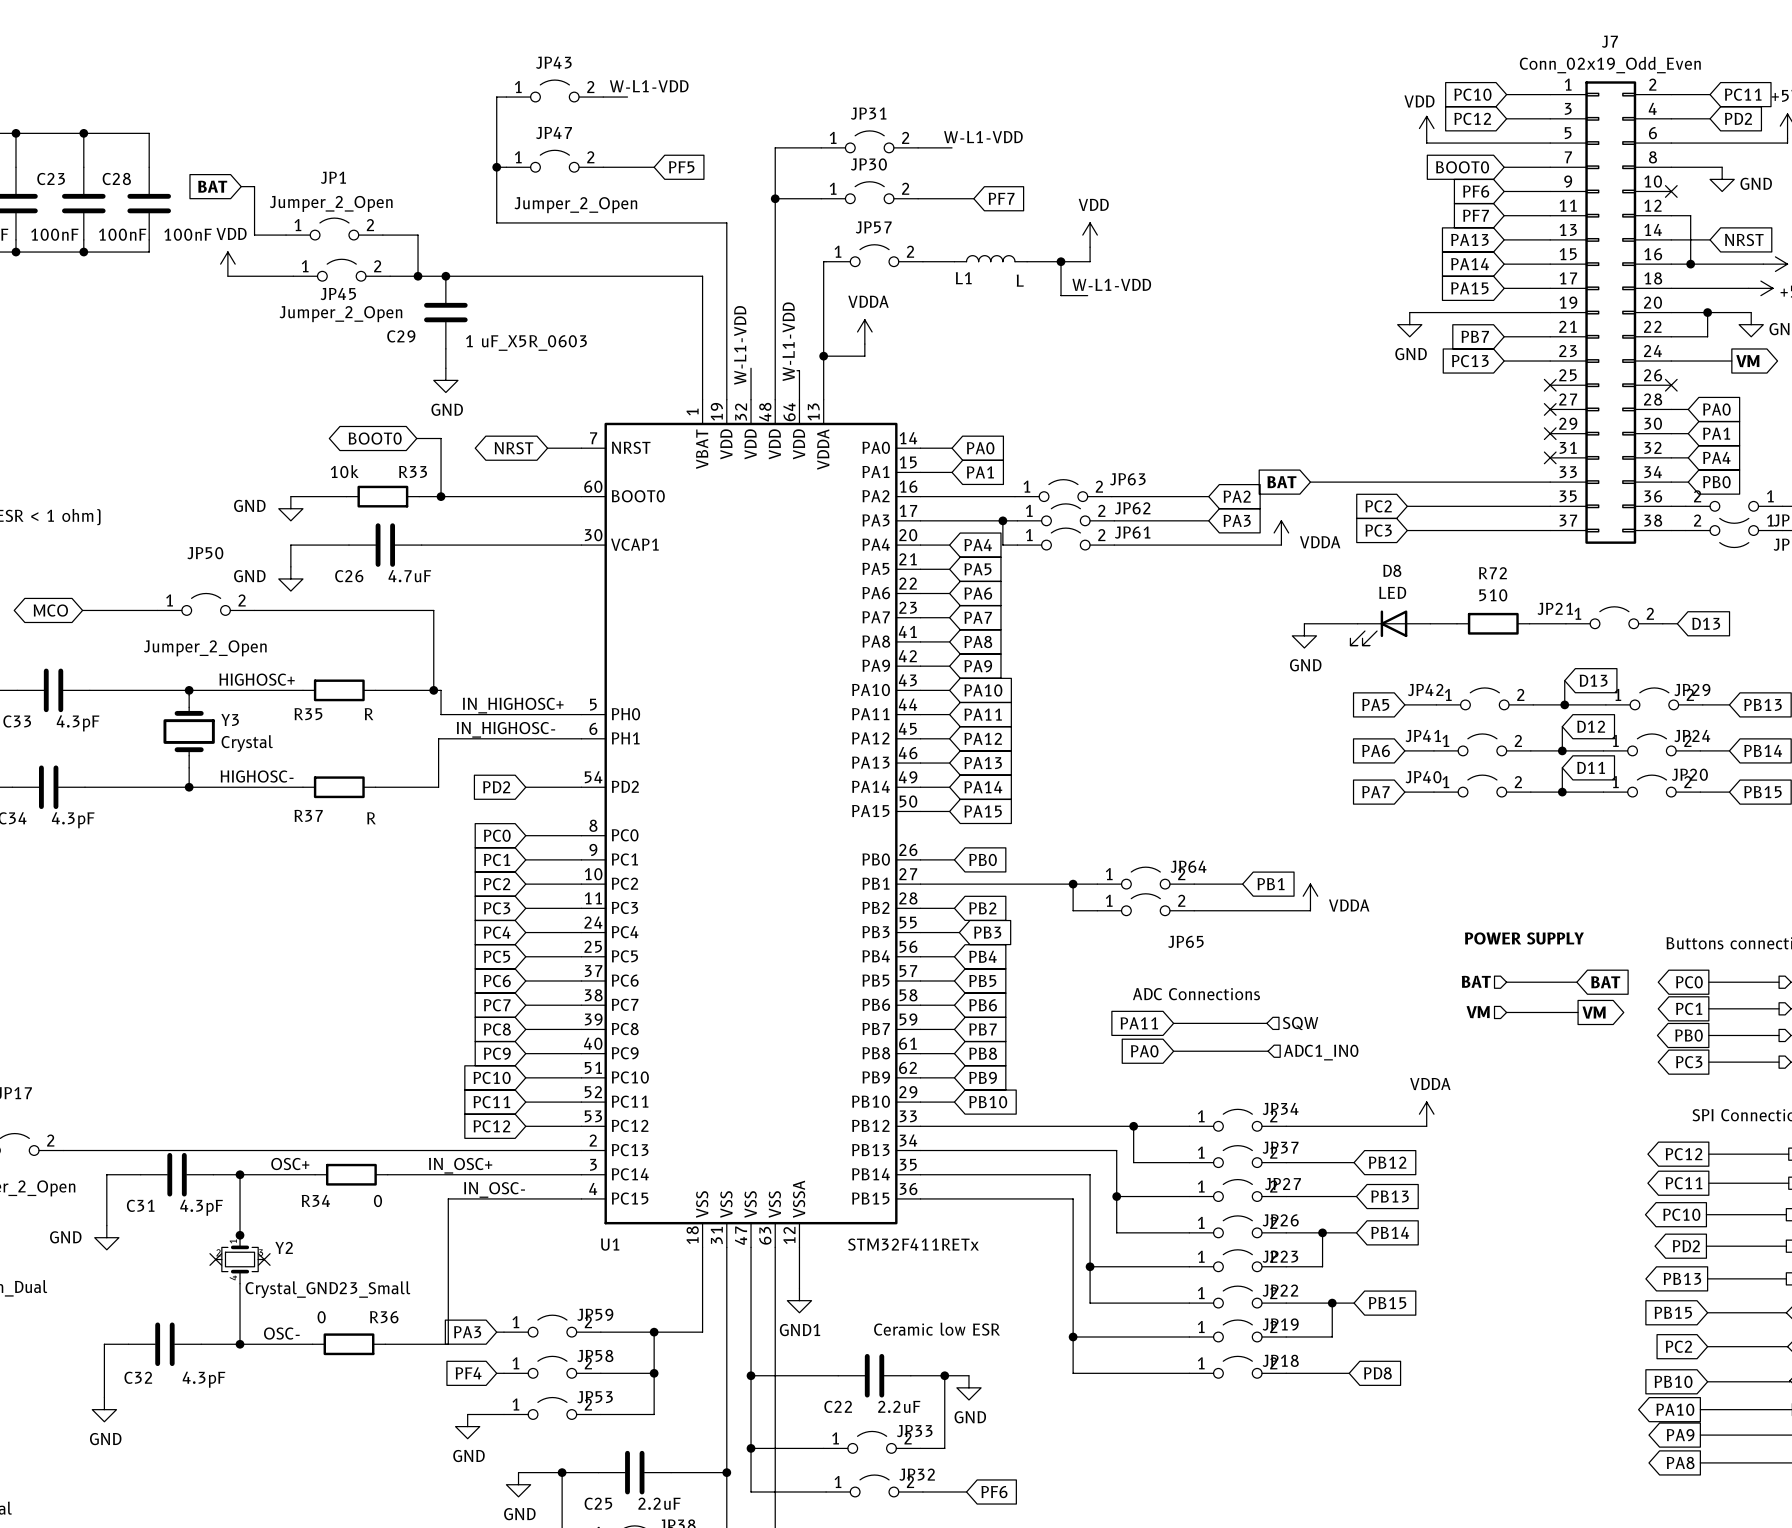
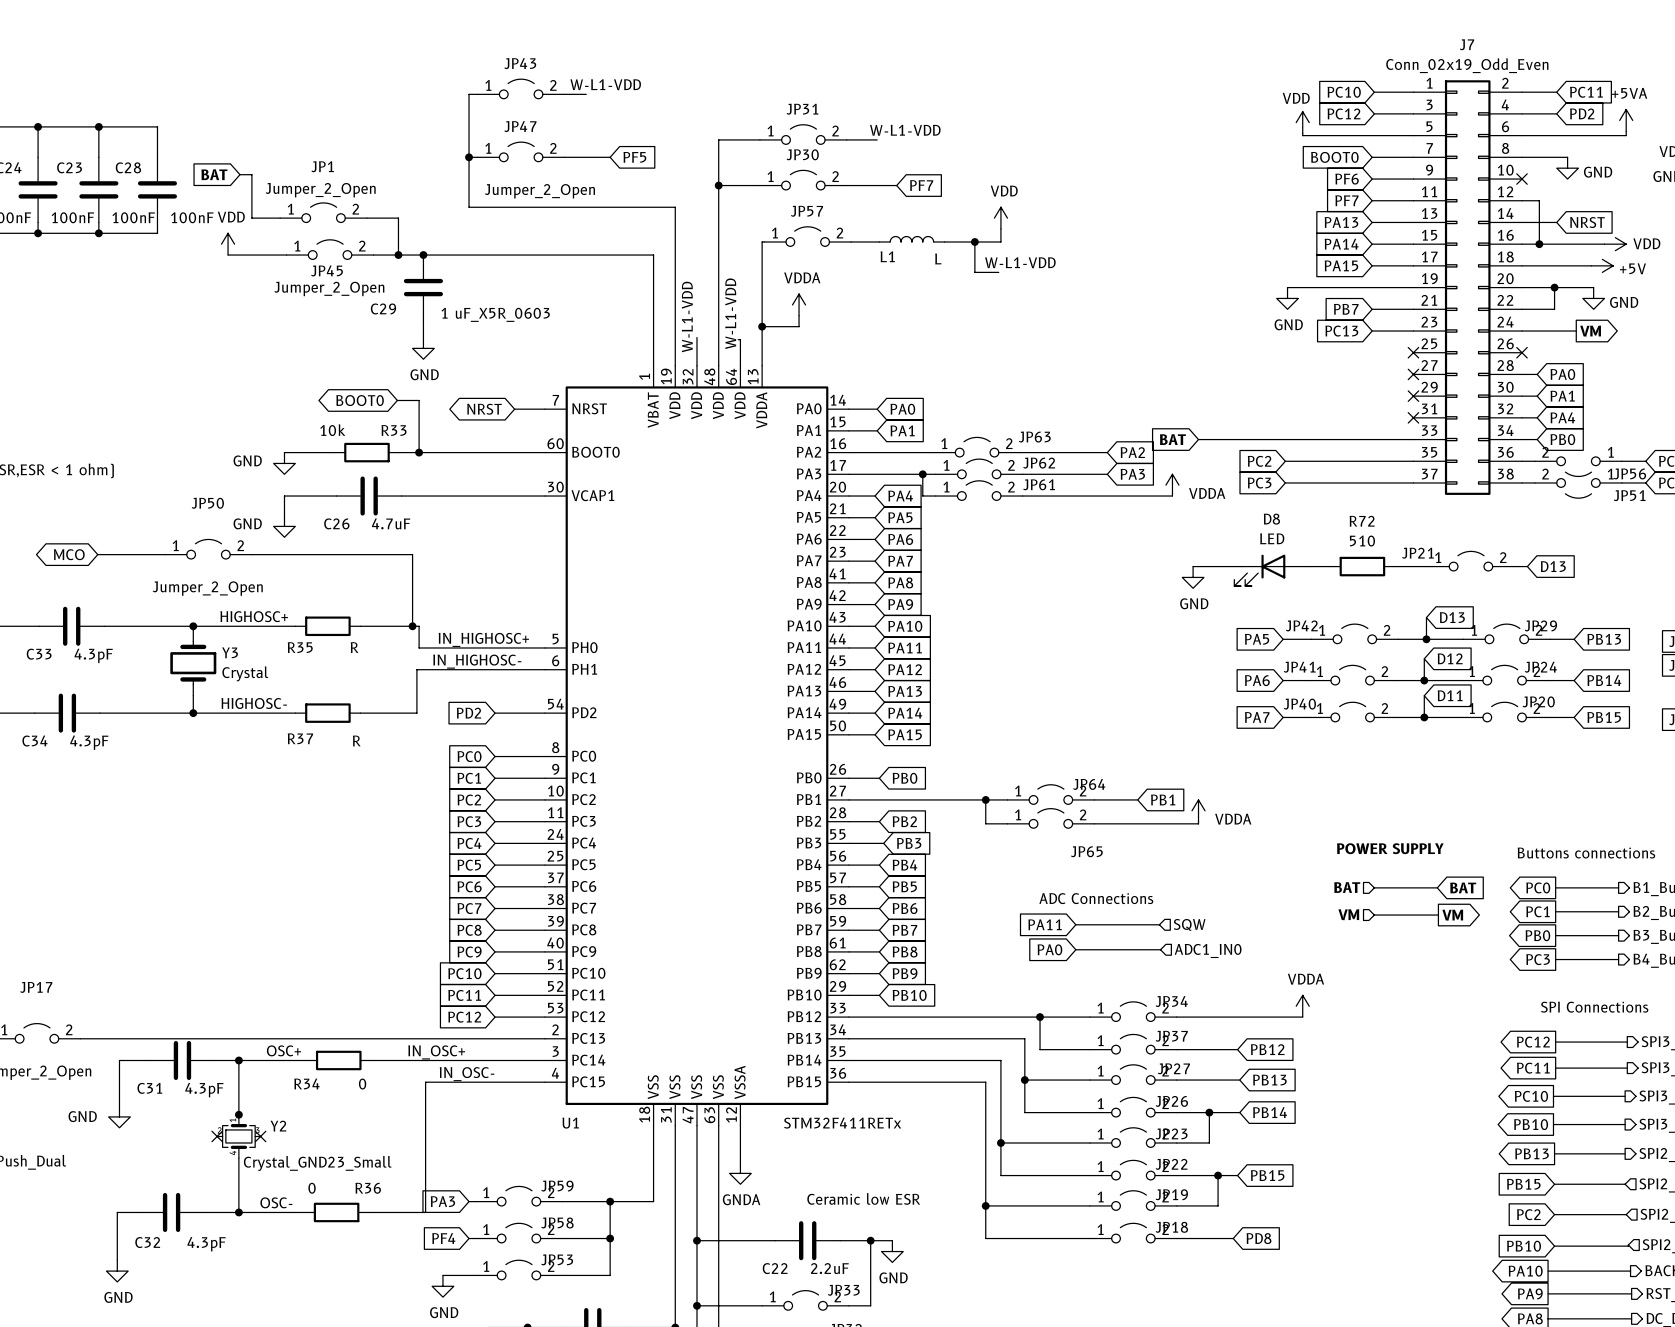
global label: PD2 (1686, 1246) -> PB10 (1531, 1124)
power symbol: GND1 (799, 1300) -> GNDA (740, 1173)

